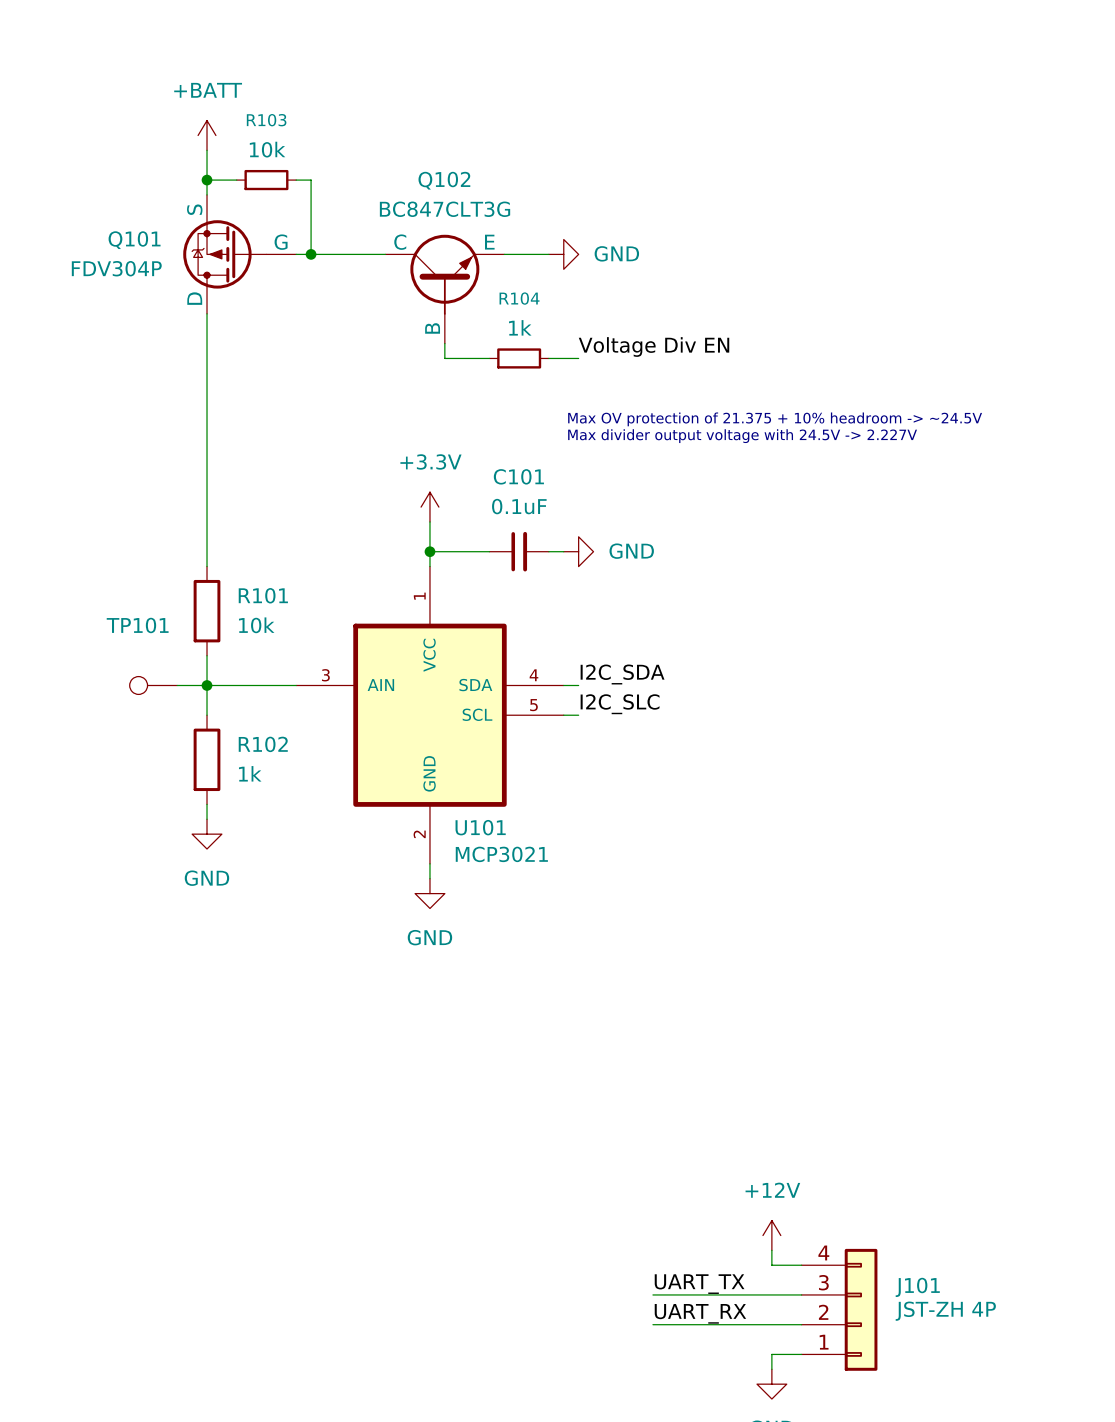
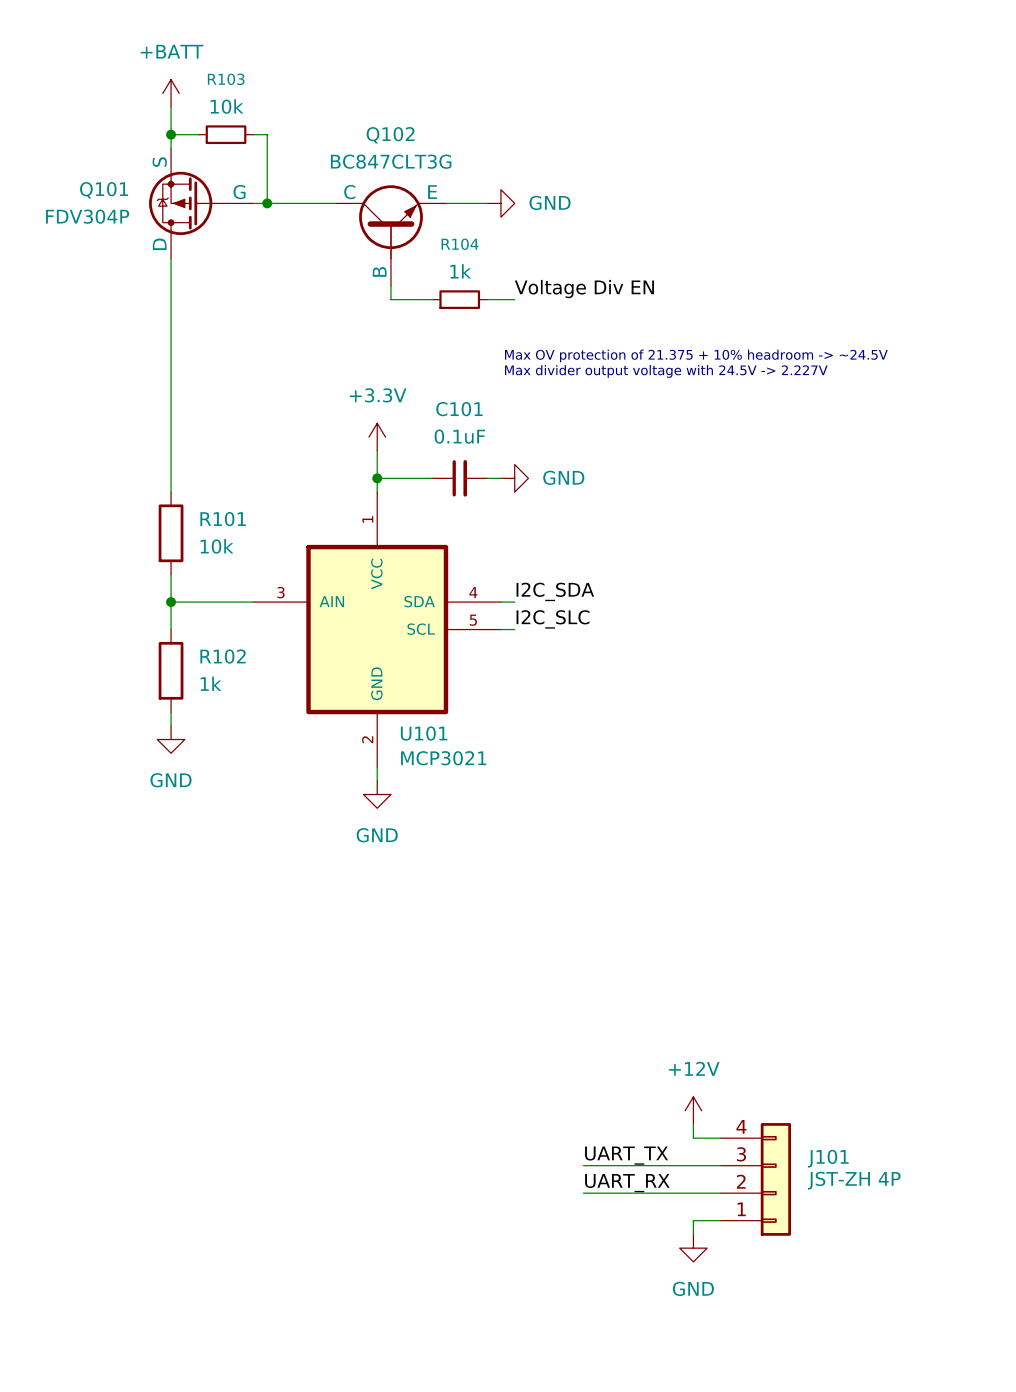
TP101: (153, 685) -> none
wire: (177, 685) (207, 685) -> none

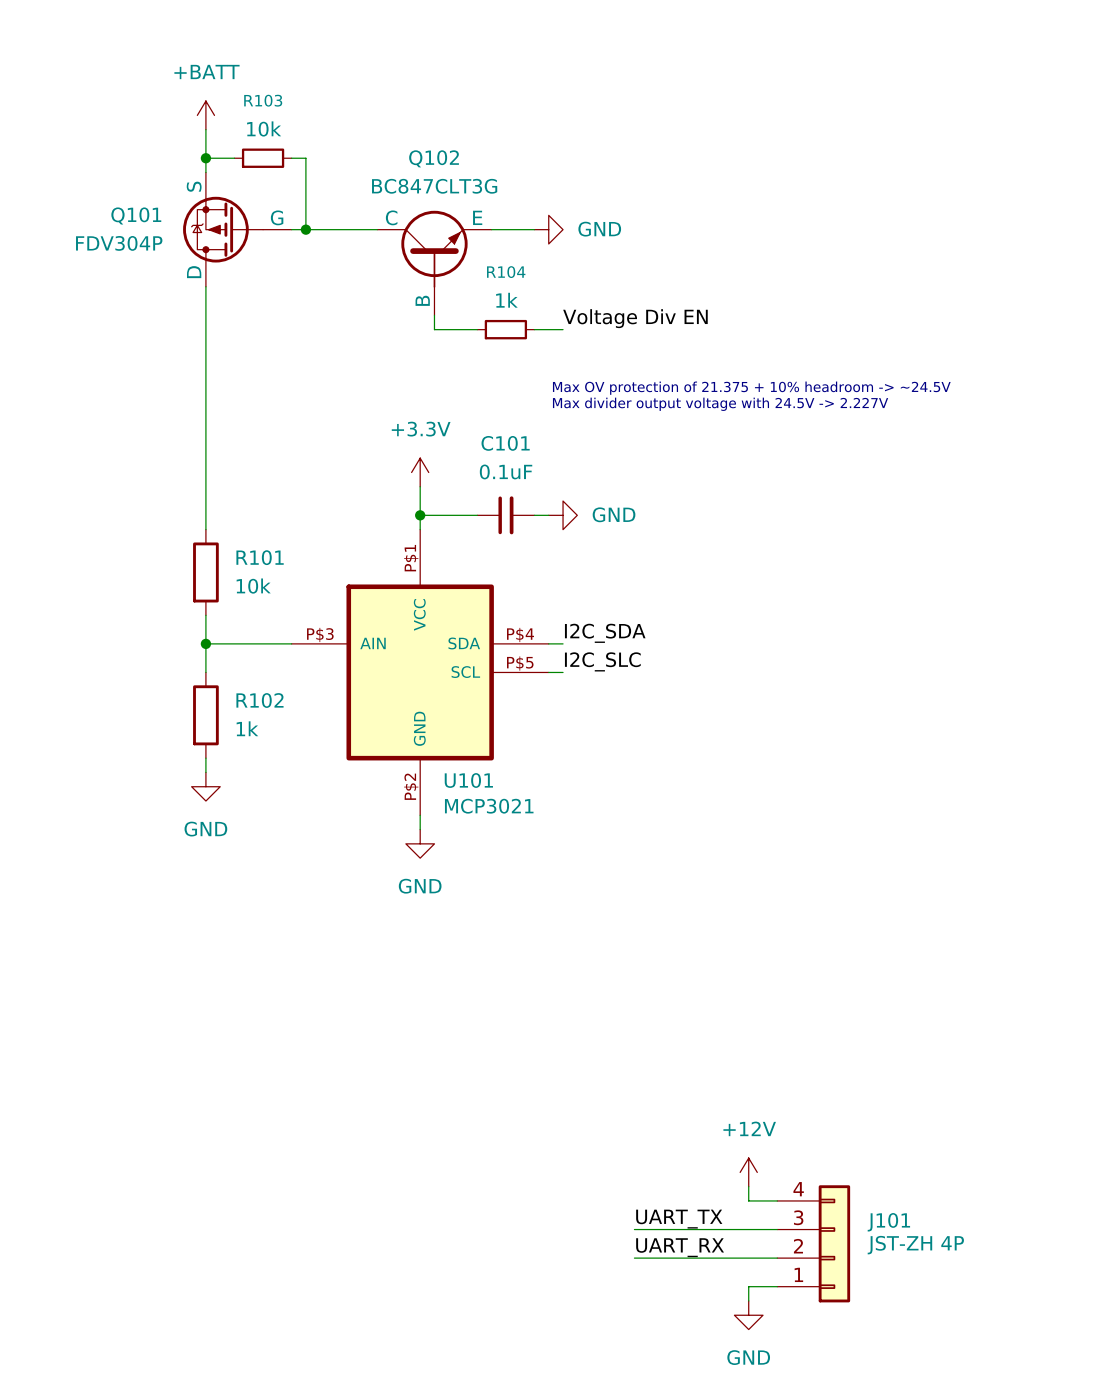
U101 pin number: 1 (367, 519) -> P$1 (411, 558)
U101 pin number: 3 (280, 592) -> P$3 (320, 634)
U101 pin number: 4 (473, 592) -> P$4 (520, 634)
U101 pin number: 5 (473, 620) -> P$5 (520, 663)
U101 pin number: 2 (367, 739) -> P$2 (411, 786)

